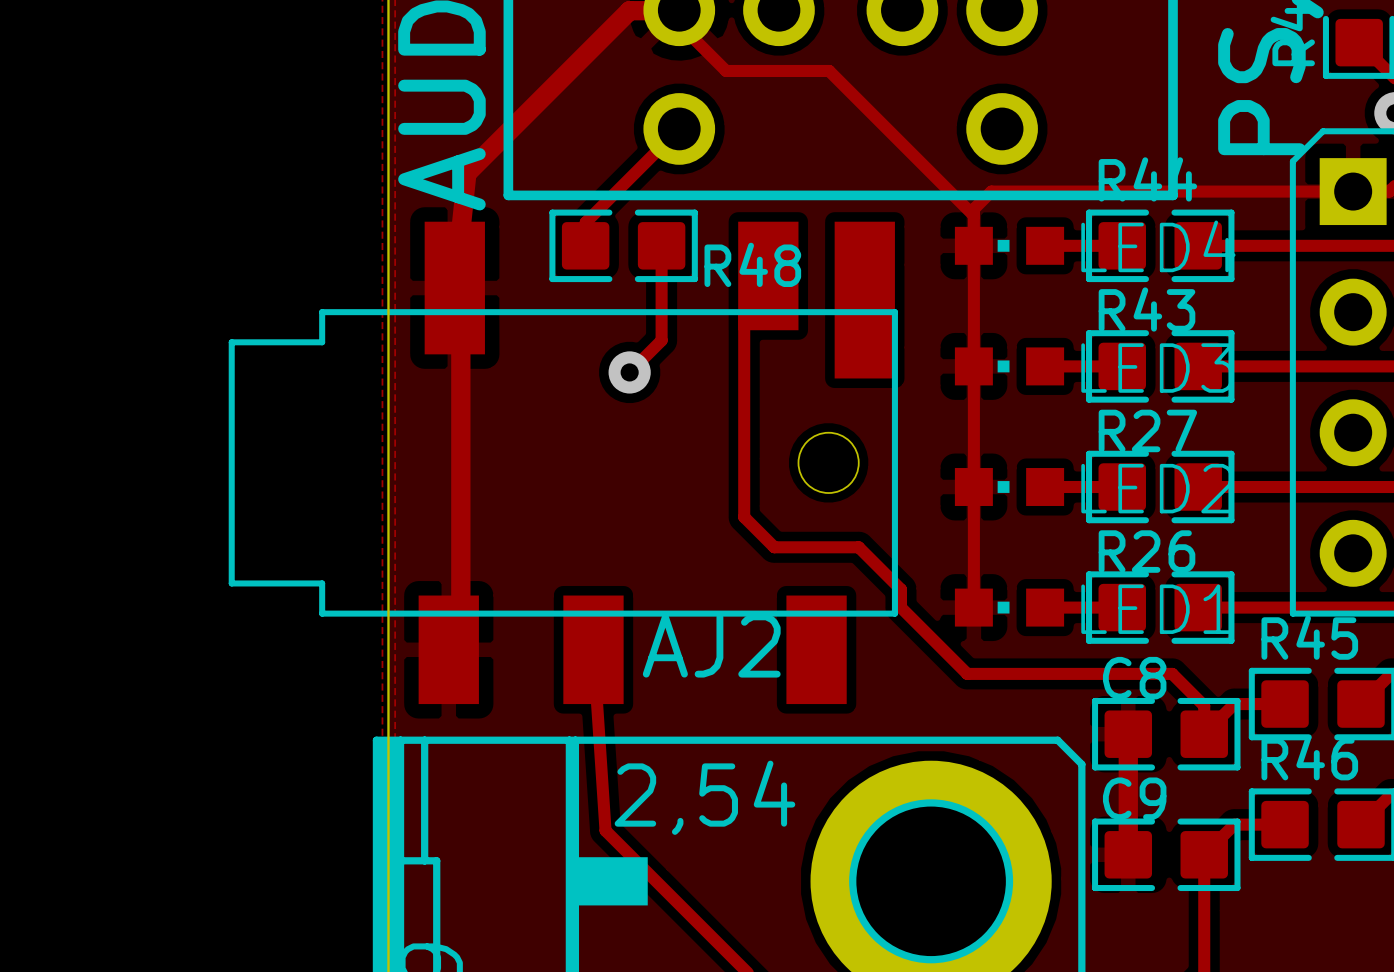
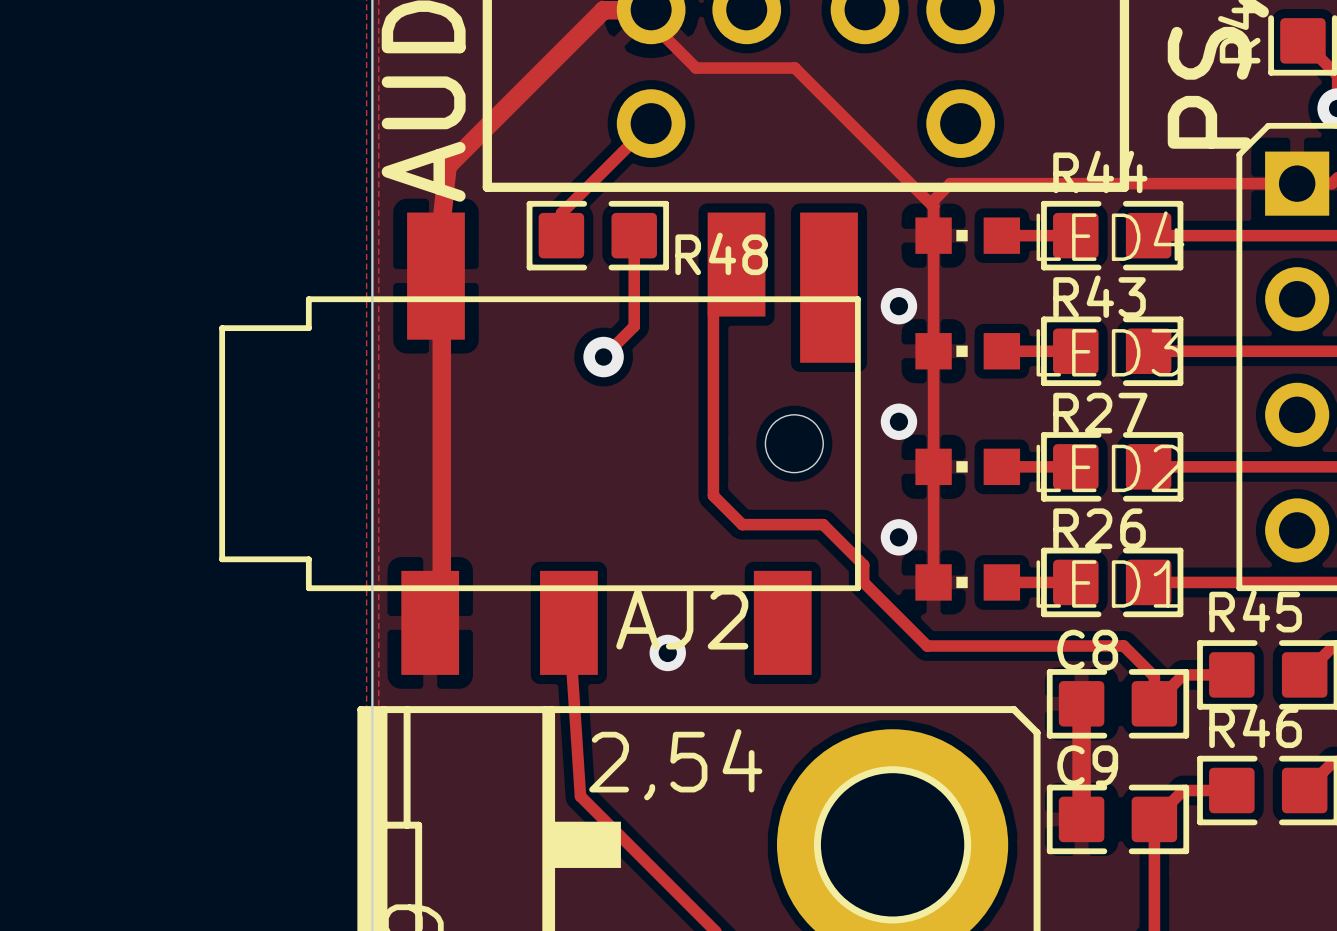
via: none -> (898, 306)
via: none -> (898, 421)
via: none -> (898, 537)
via: none -> (667, 652)

